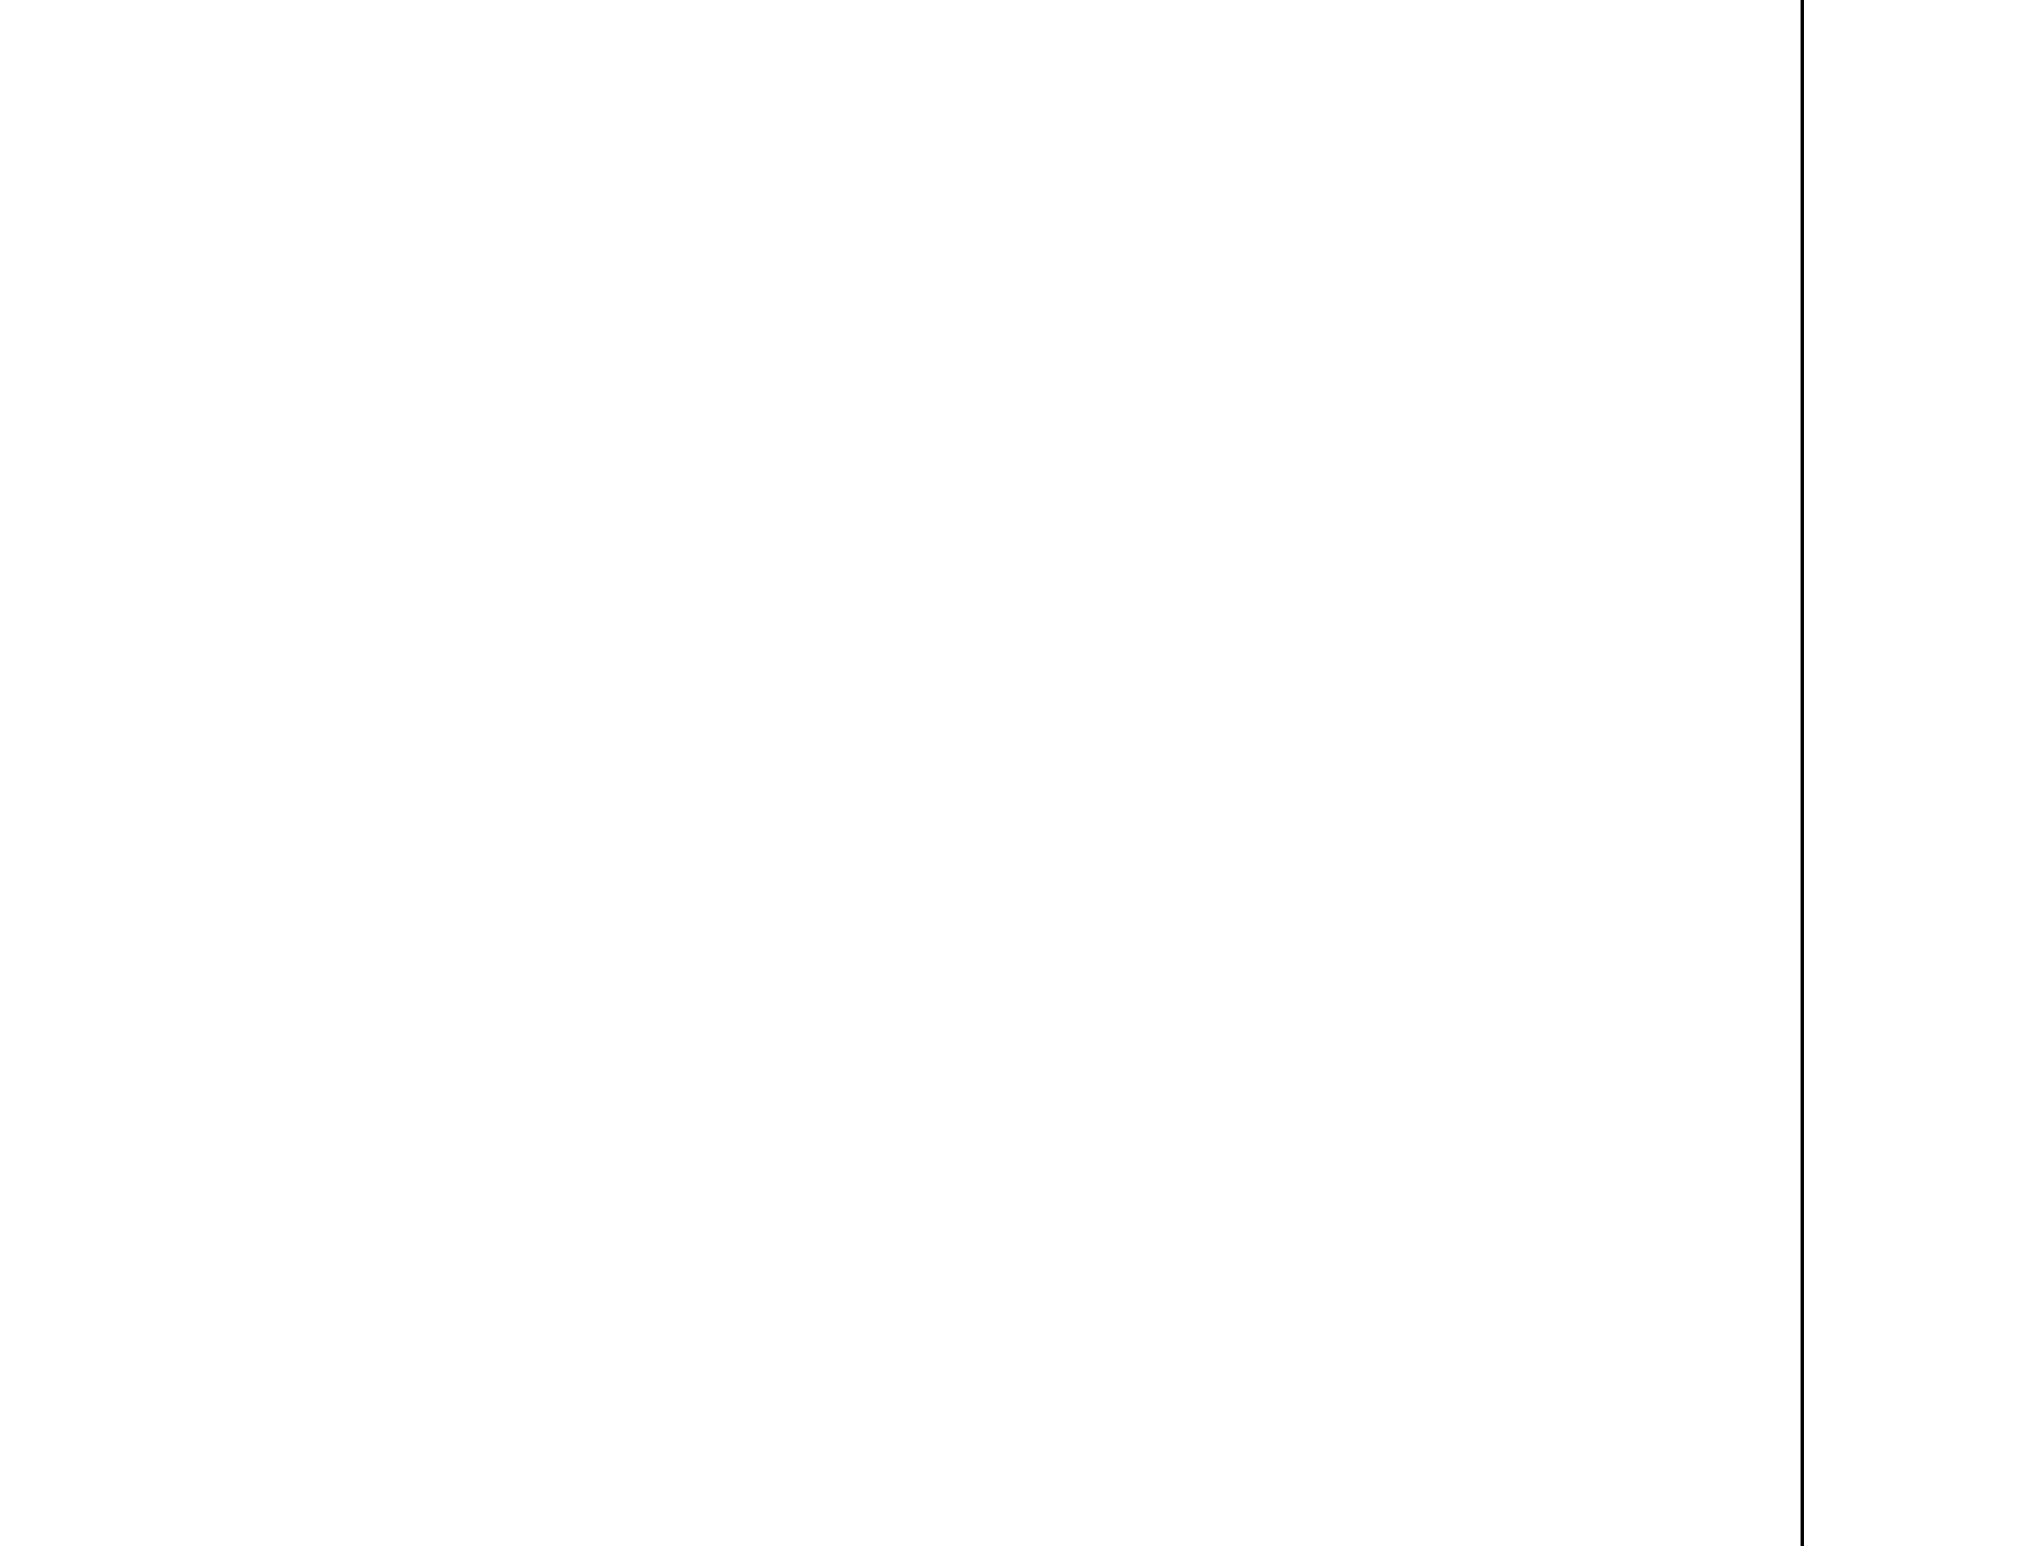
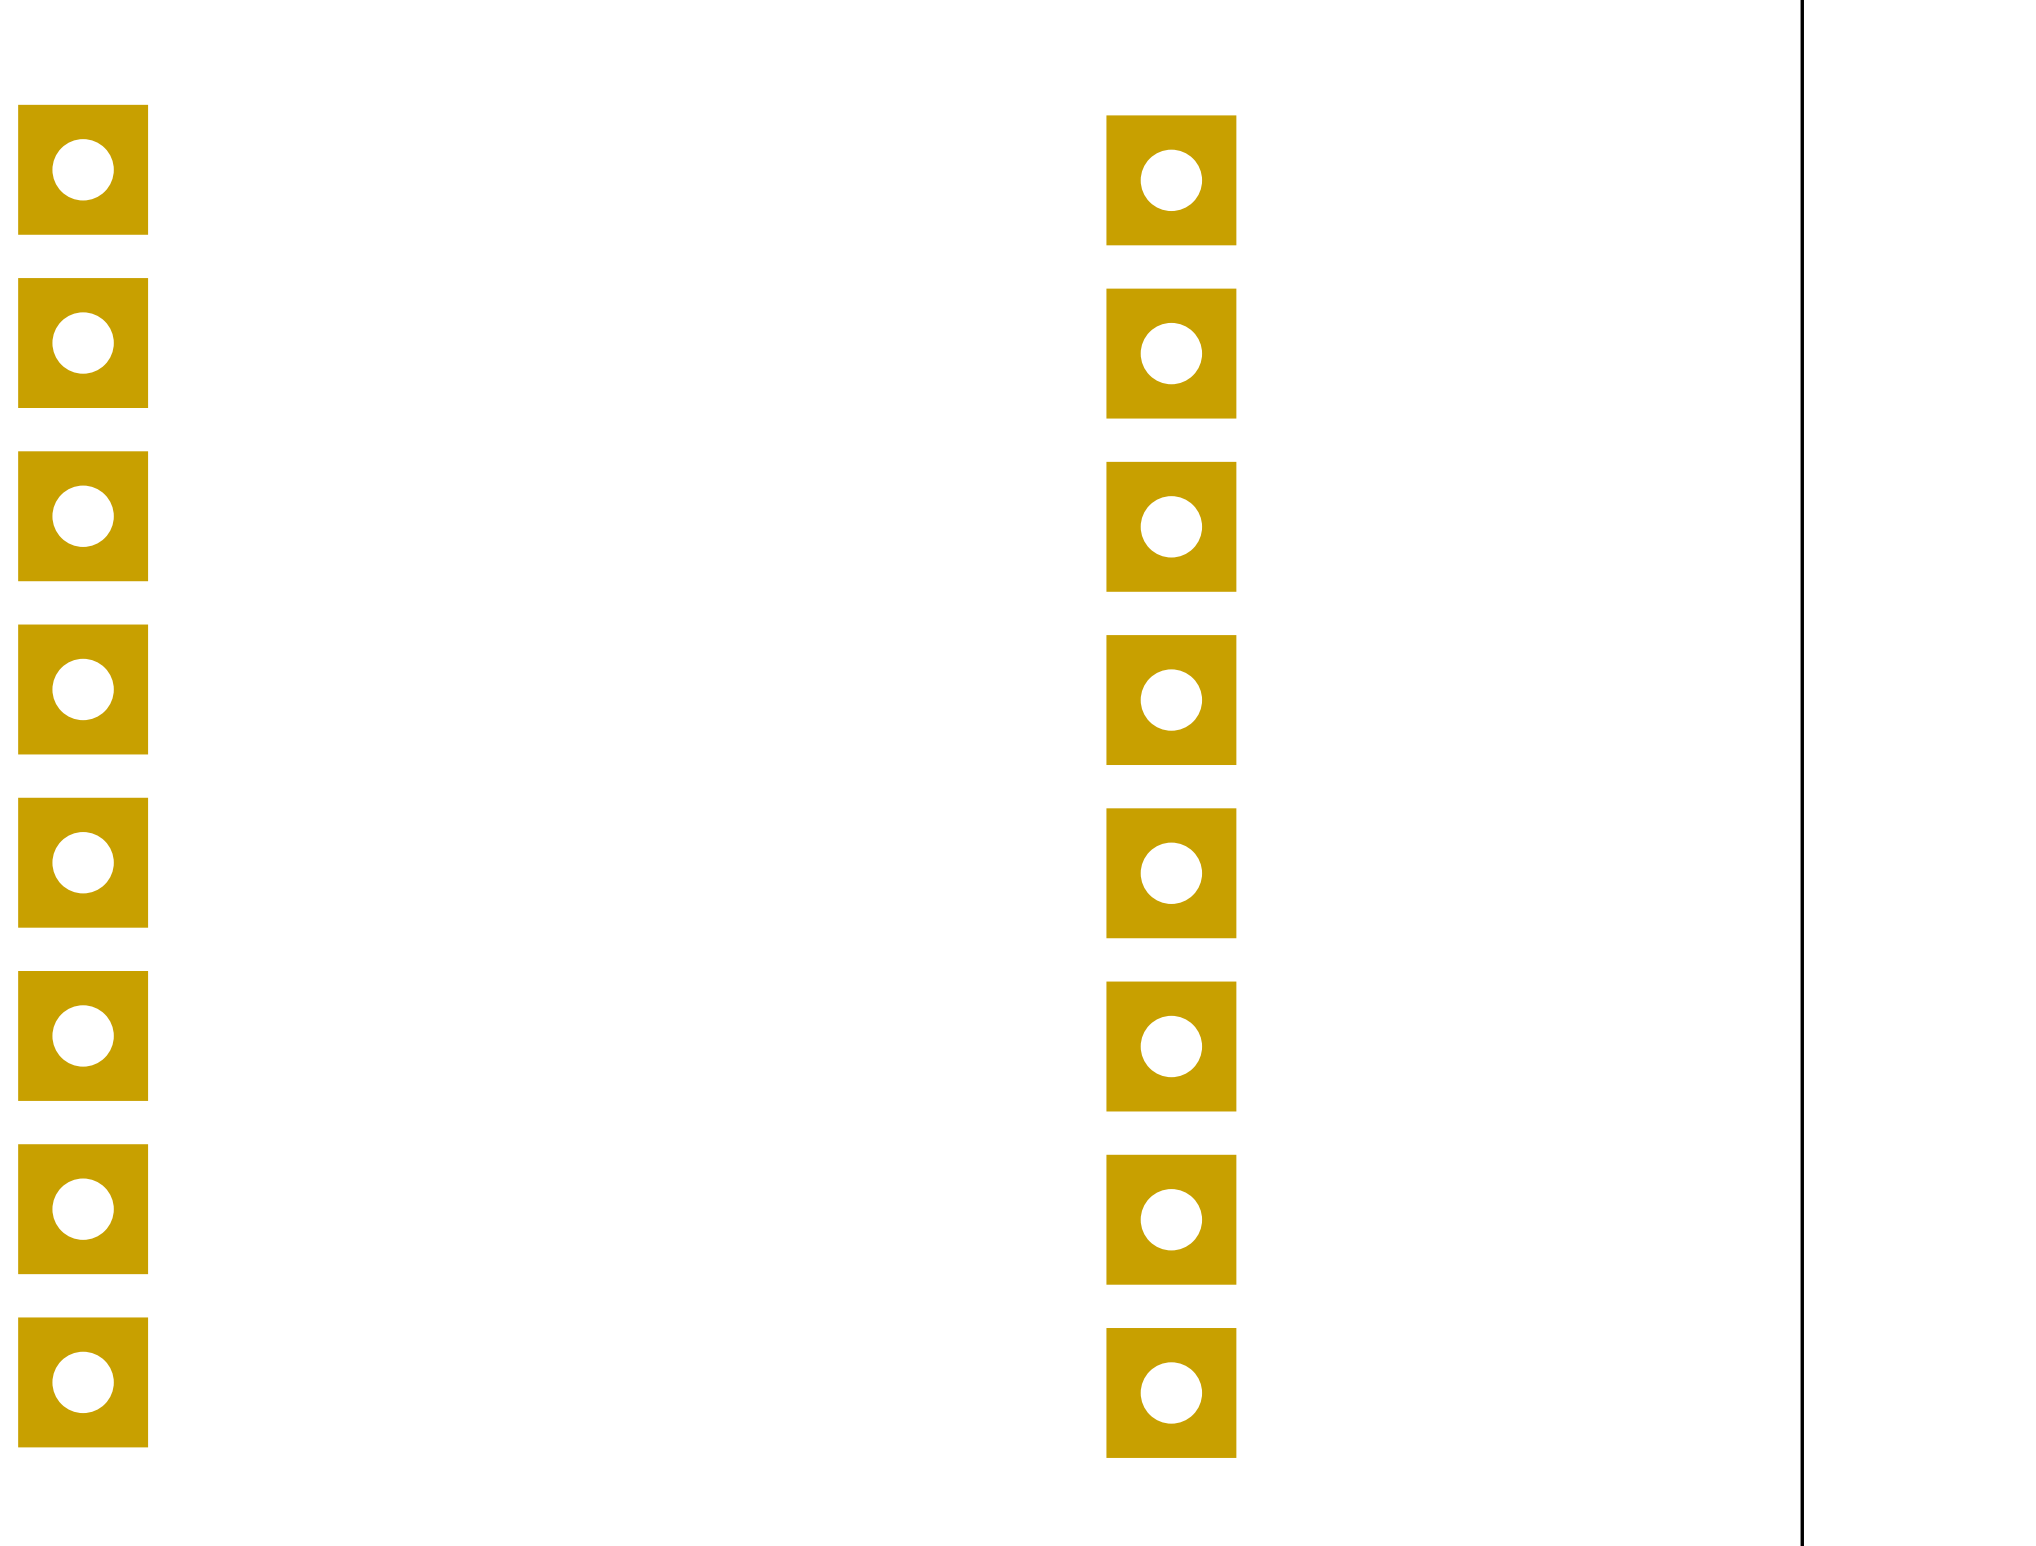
part: none -> (83, 776)
part: none -> (1171, 786)

